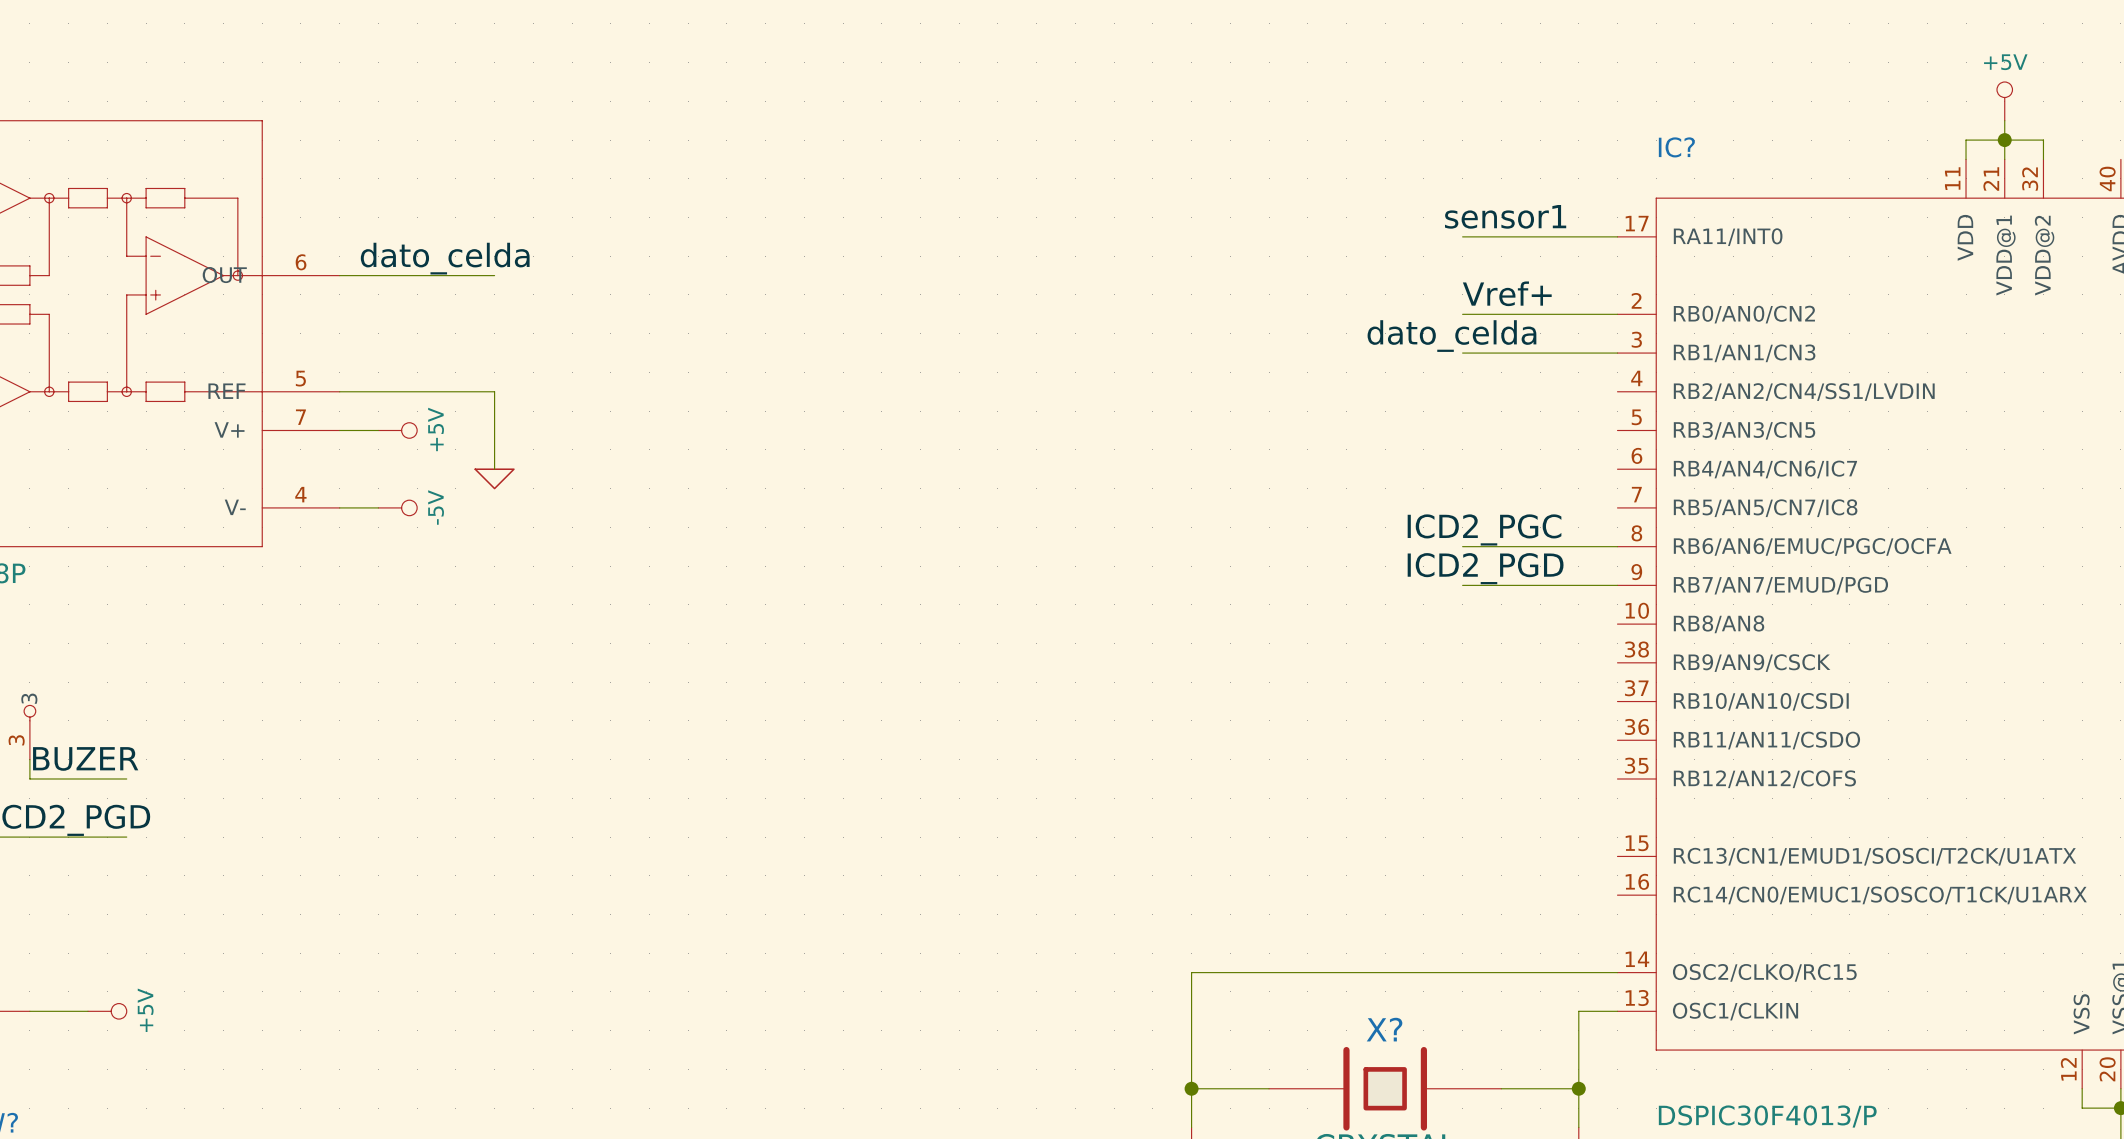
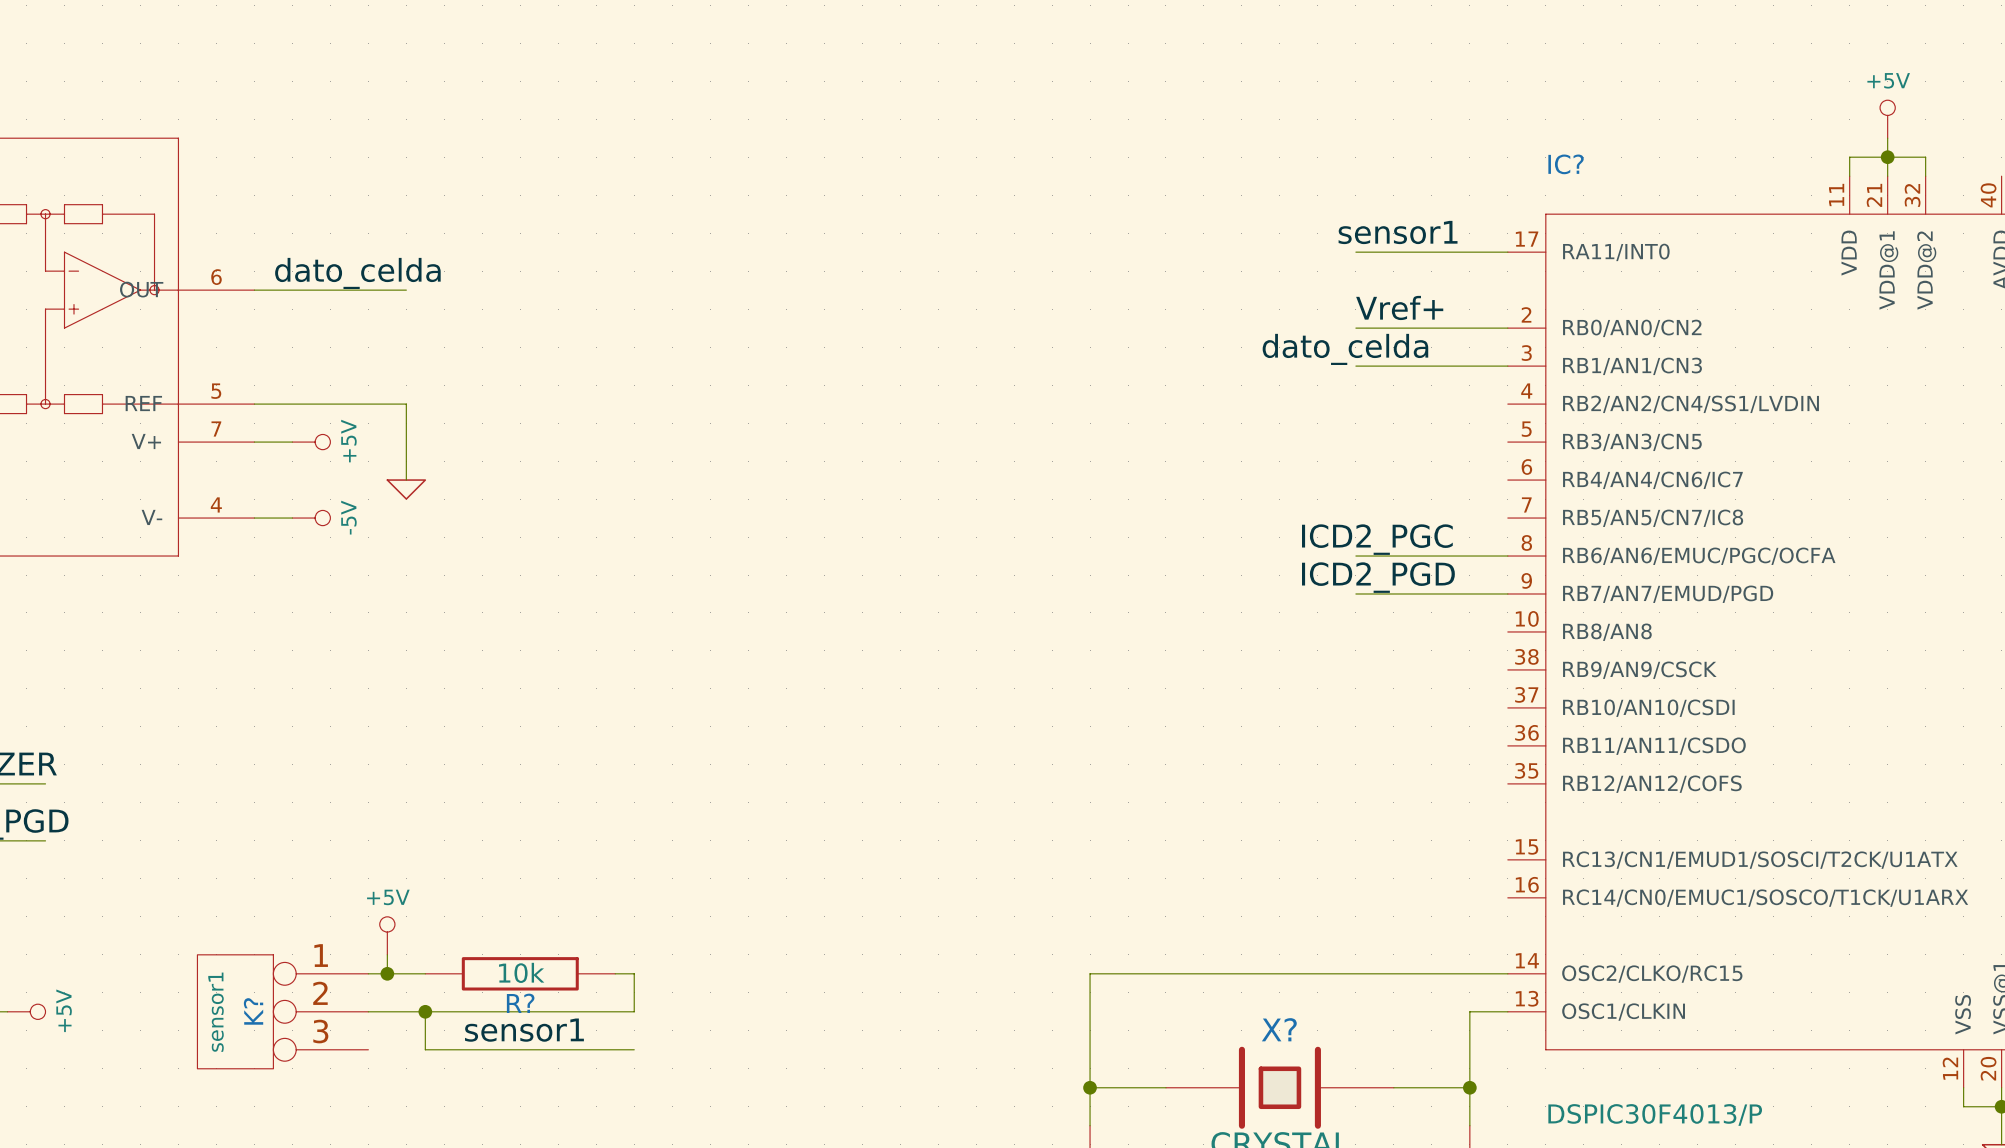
power symbol: none -> +5V (387, 935)
wire: none -> (387, 954) (387, 973)
wire: none -> (368, 973) (425, 973)
junction: none -> (387, 973)
R?: none -> 10k (520, 973)
wire: none -> (615, 973) (634, 973) (634, 1011) (368, 1011)
K?: none -> sensor1 (282, 1011)
wire: none -> (425, 1011) (425, 1049) (634, 1049)
junction: none -> (425, 1011)
label: none -> sensor1 (524, 1030)

